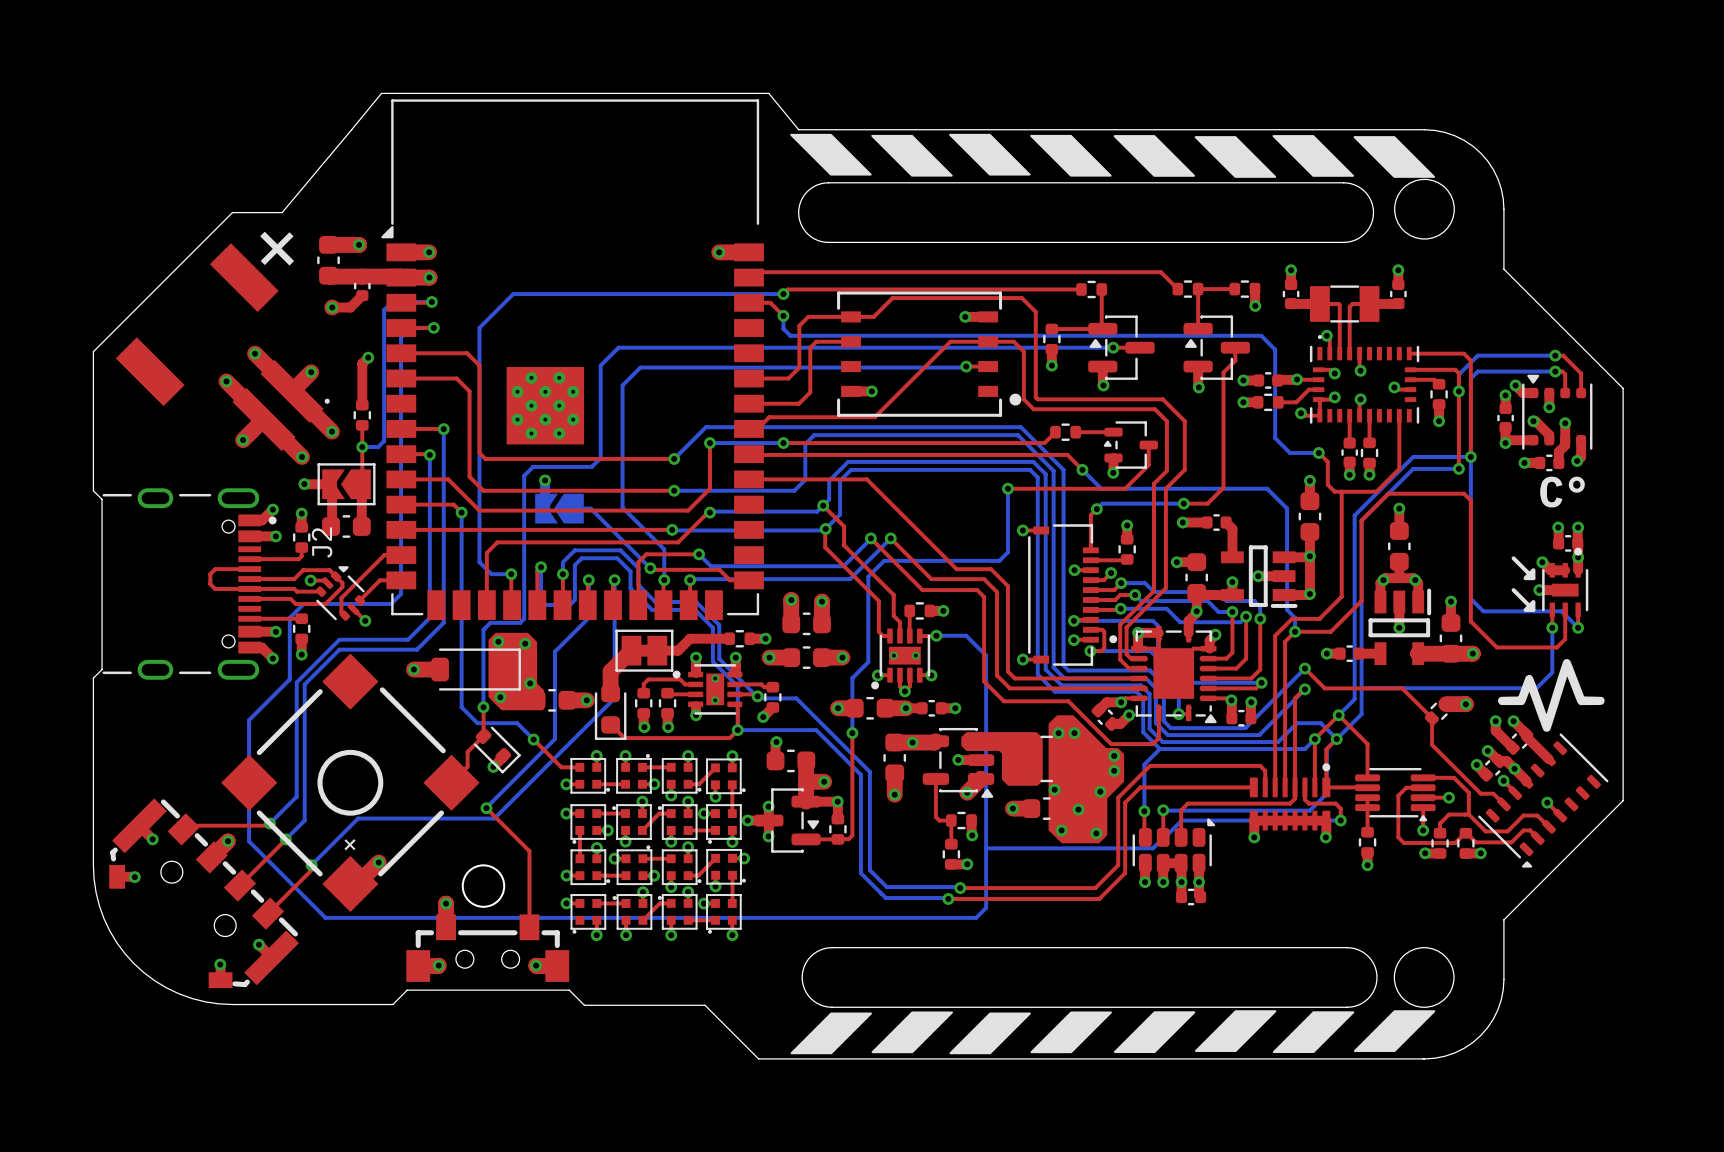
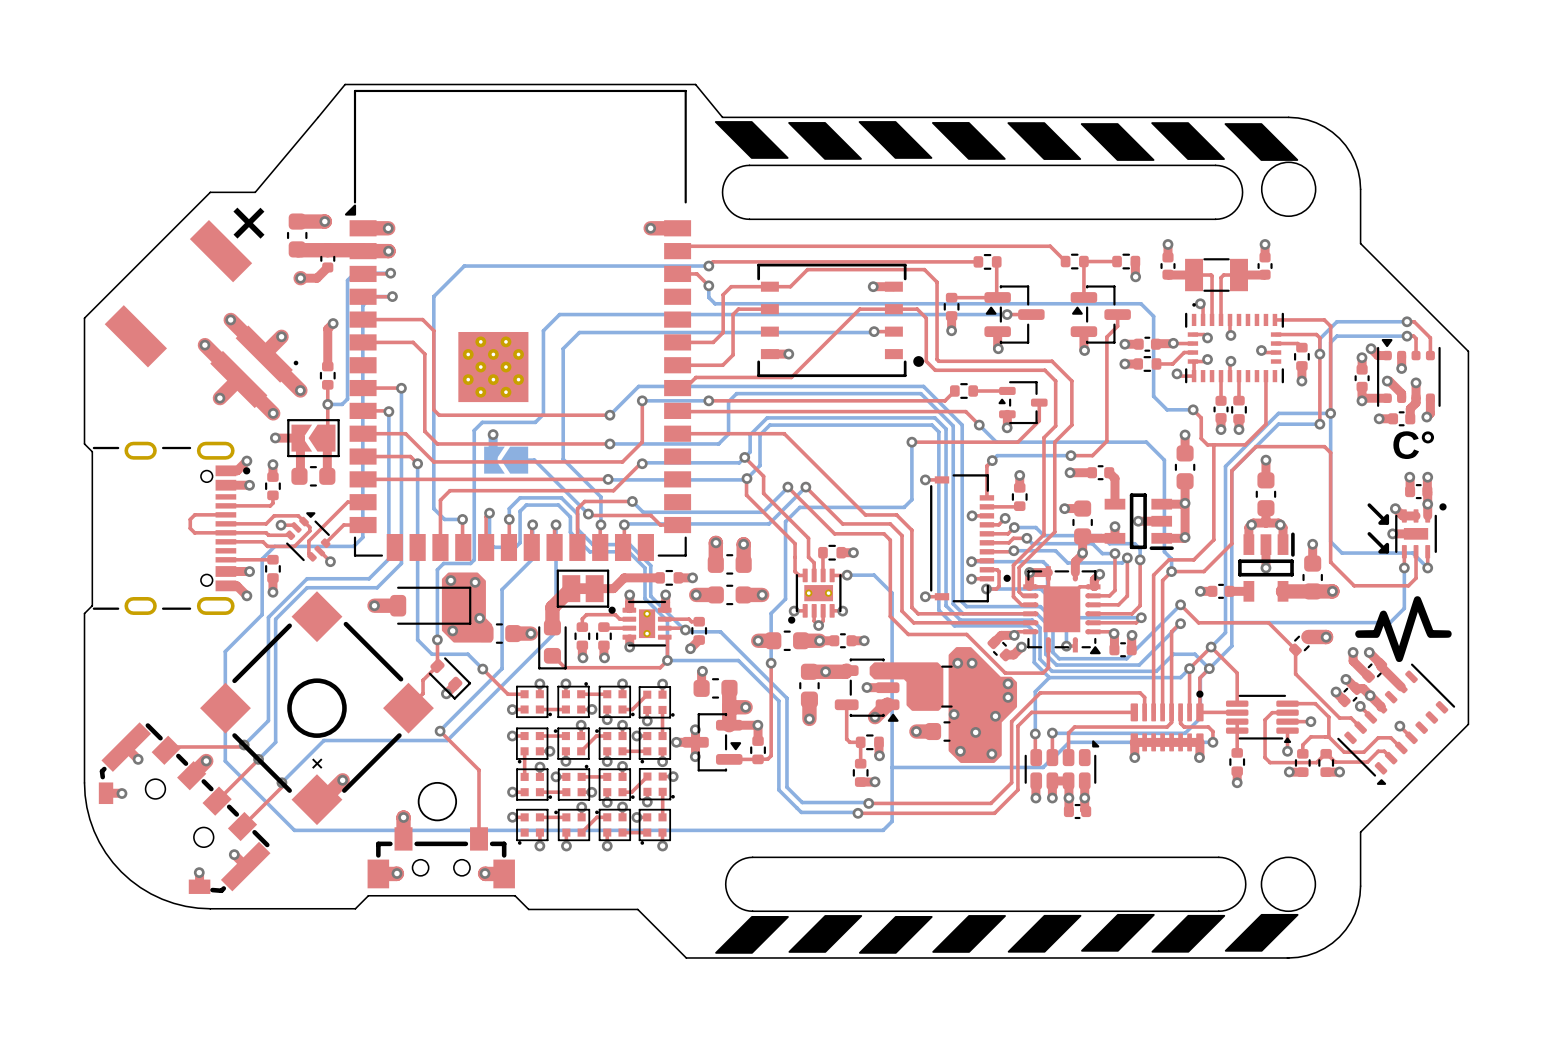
J2 name: J2 (322, 542) -> none
part footprint: [1542, 547, 1589, 618] -> [1395, 503, 1447, 559]

